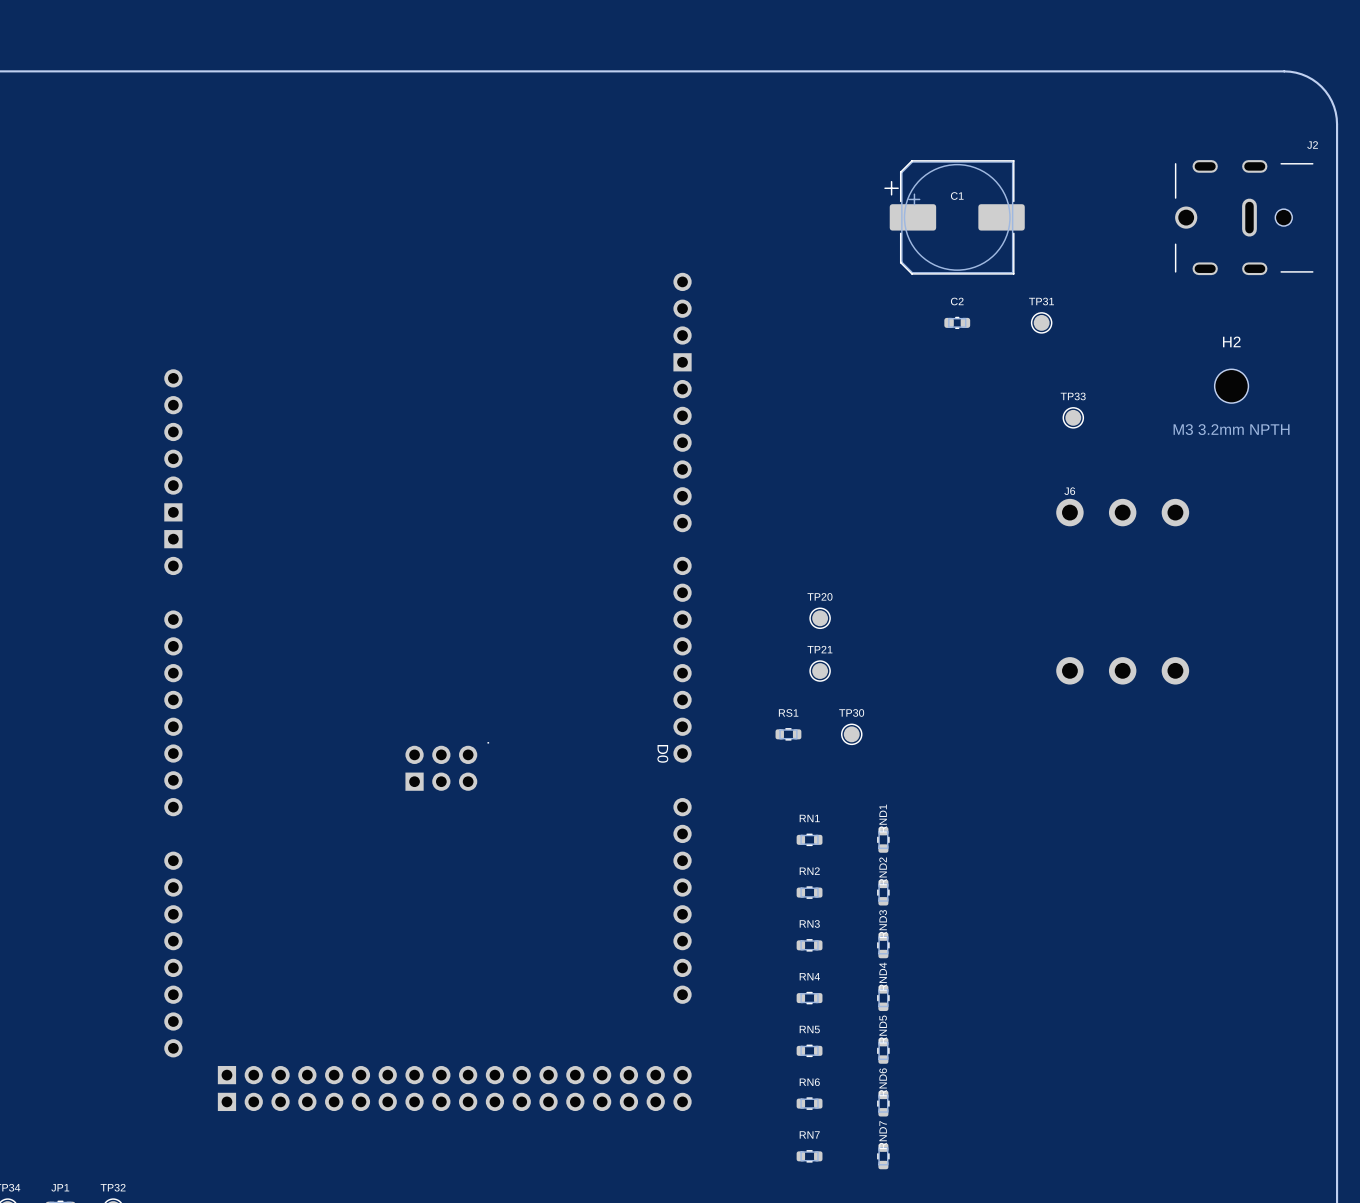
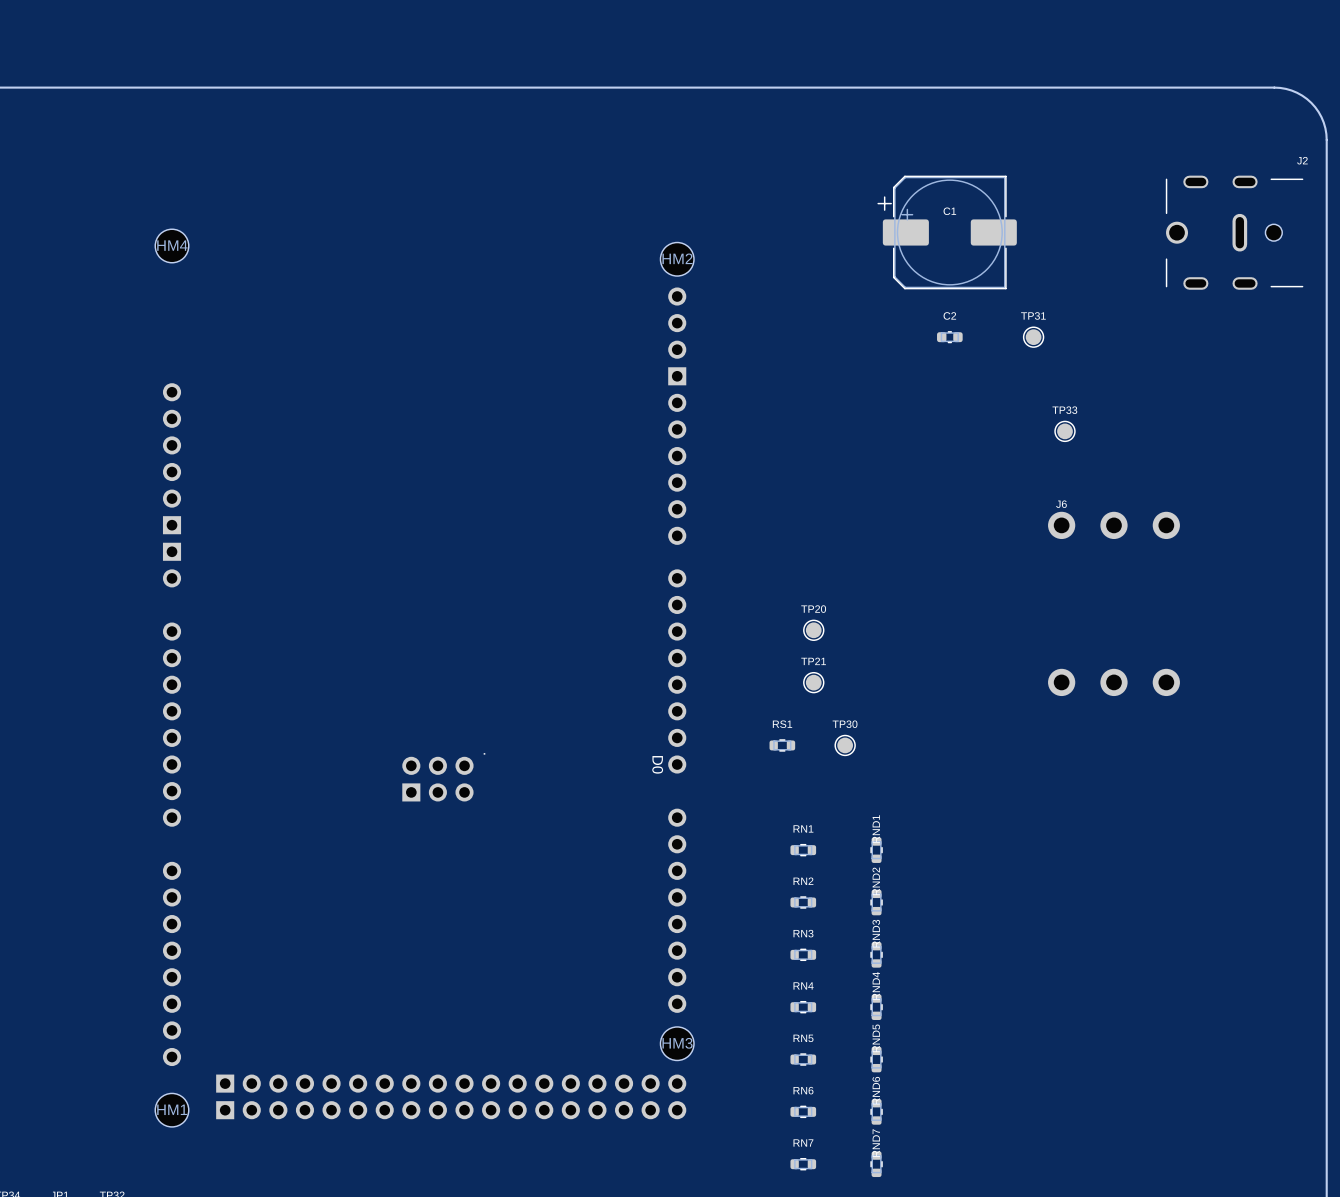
HM4: none -> (172, 245)
HM2: none -> (677, 259)
H2: M3 3.2mm NPTH (1231, 386) -> none
HM3: none -> (677, 1043)
HM1: none -> (172, 1110)

